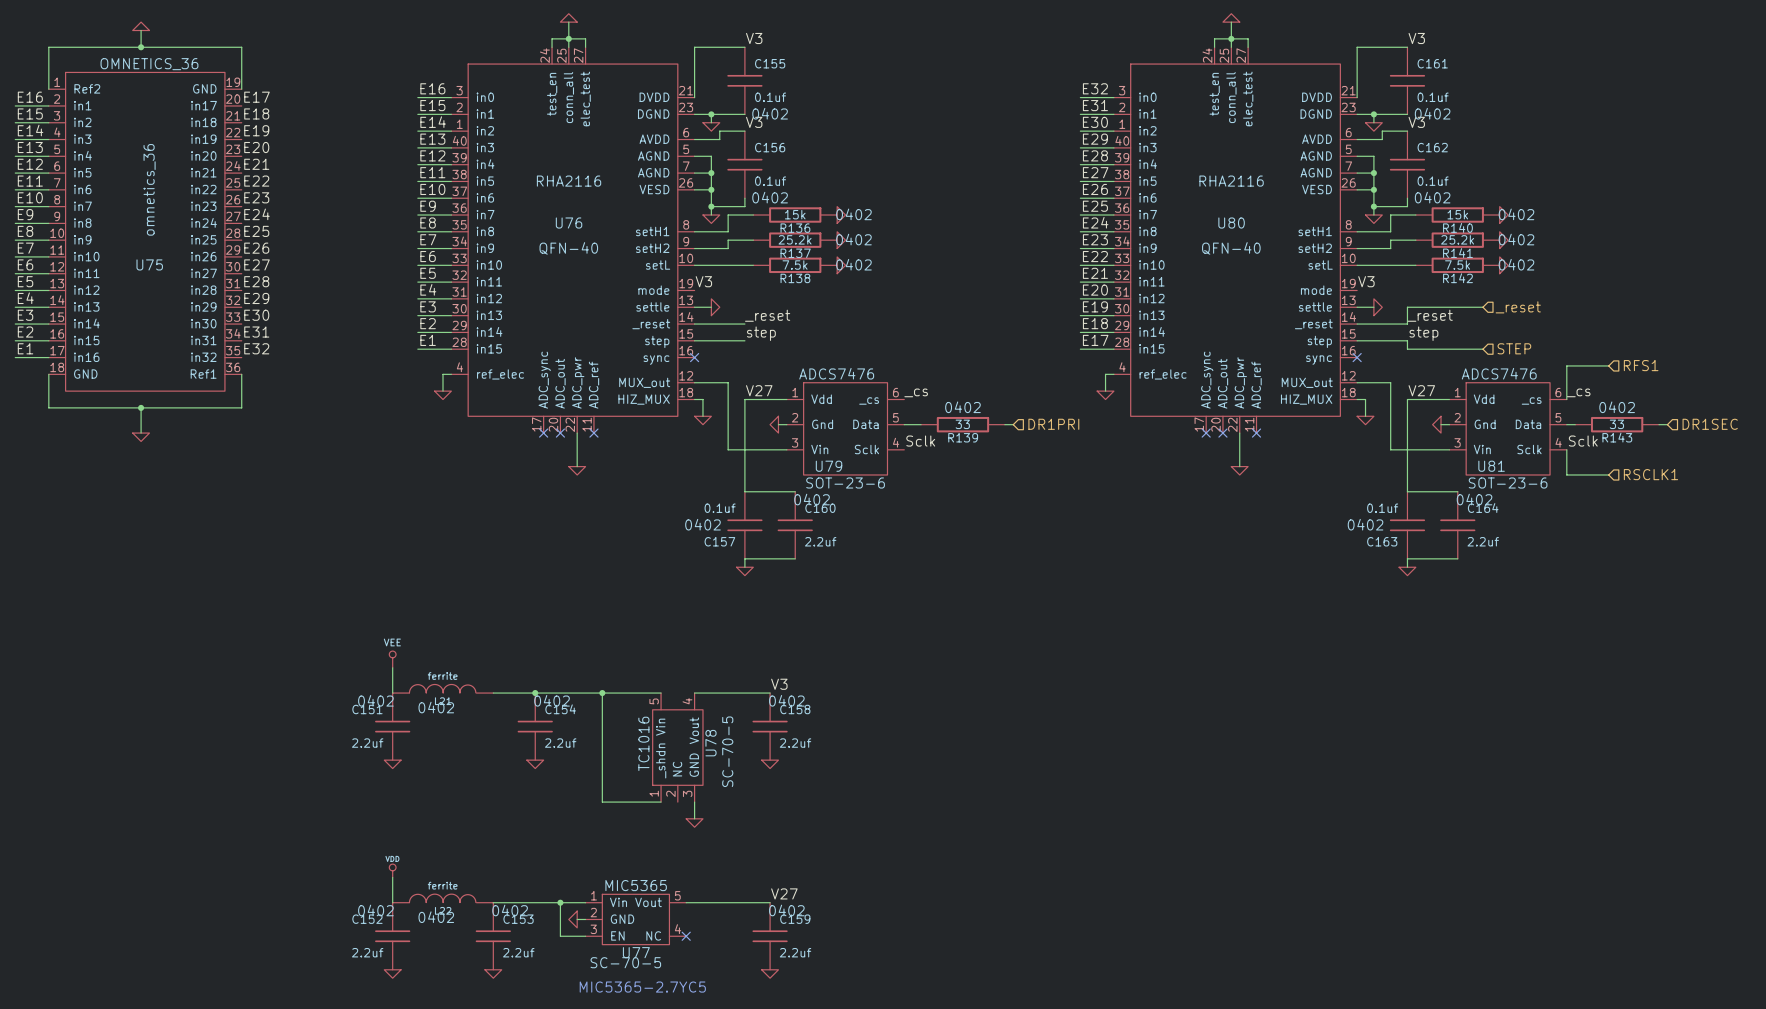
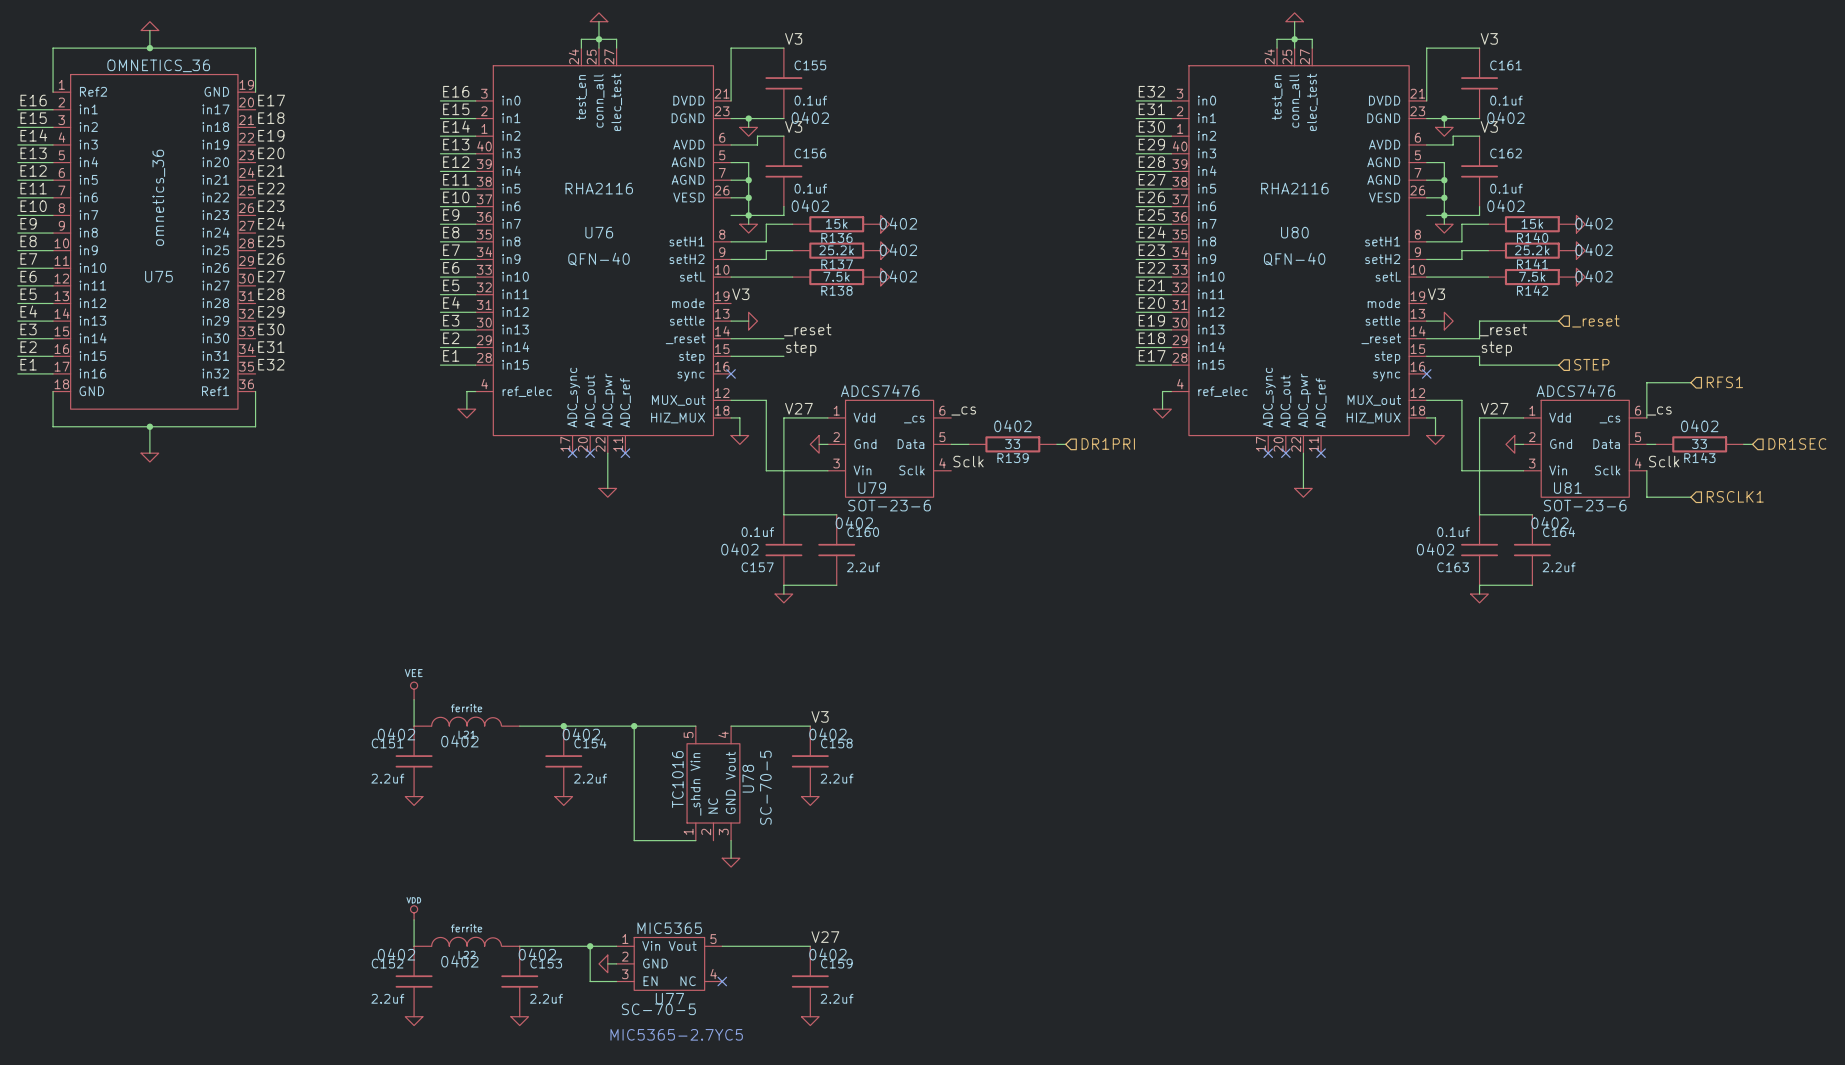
wire: none -> (731, 215) (748, 215)
wire: none -> (1426, 215) (1444, 215)

